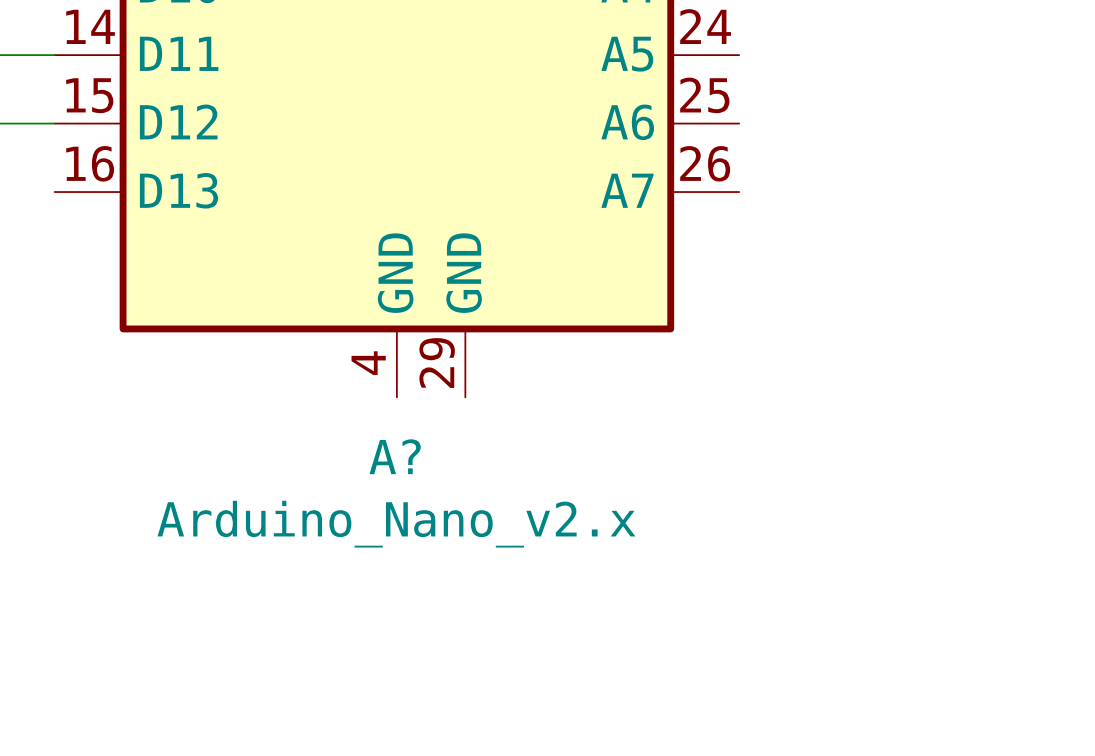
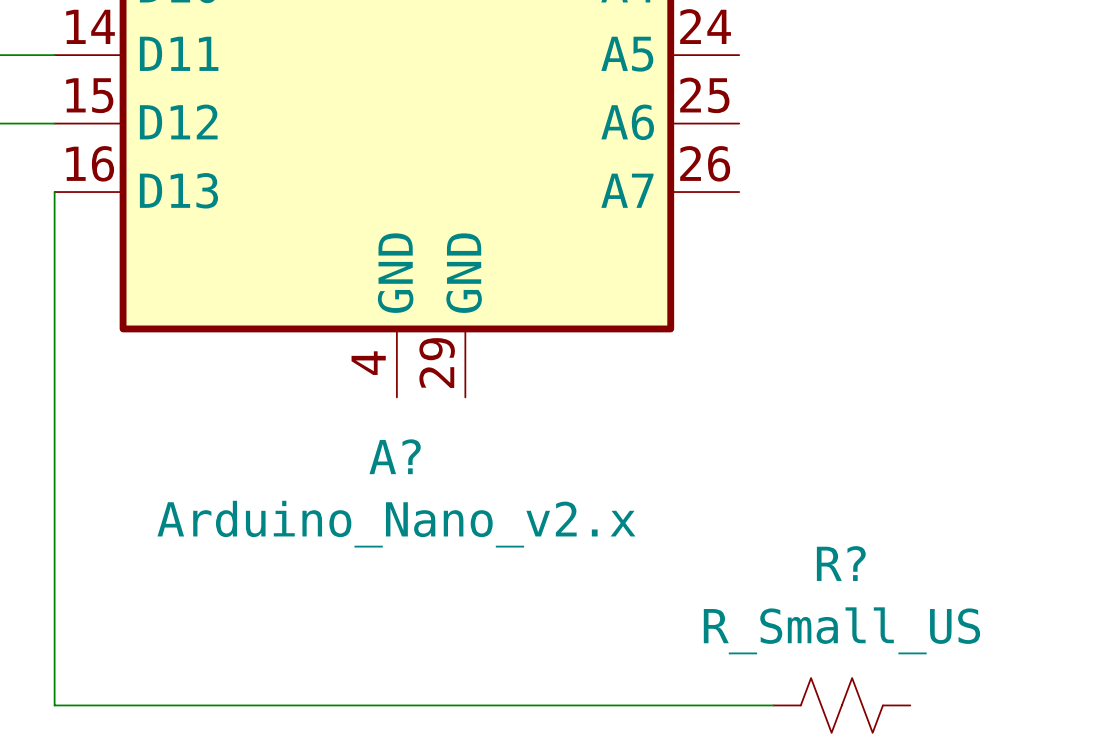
wire: none -> (54, 192) (54, 705) (773, 705)
R?: none -> R_Small_US (841, 705)

